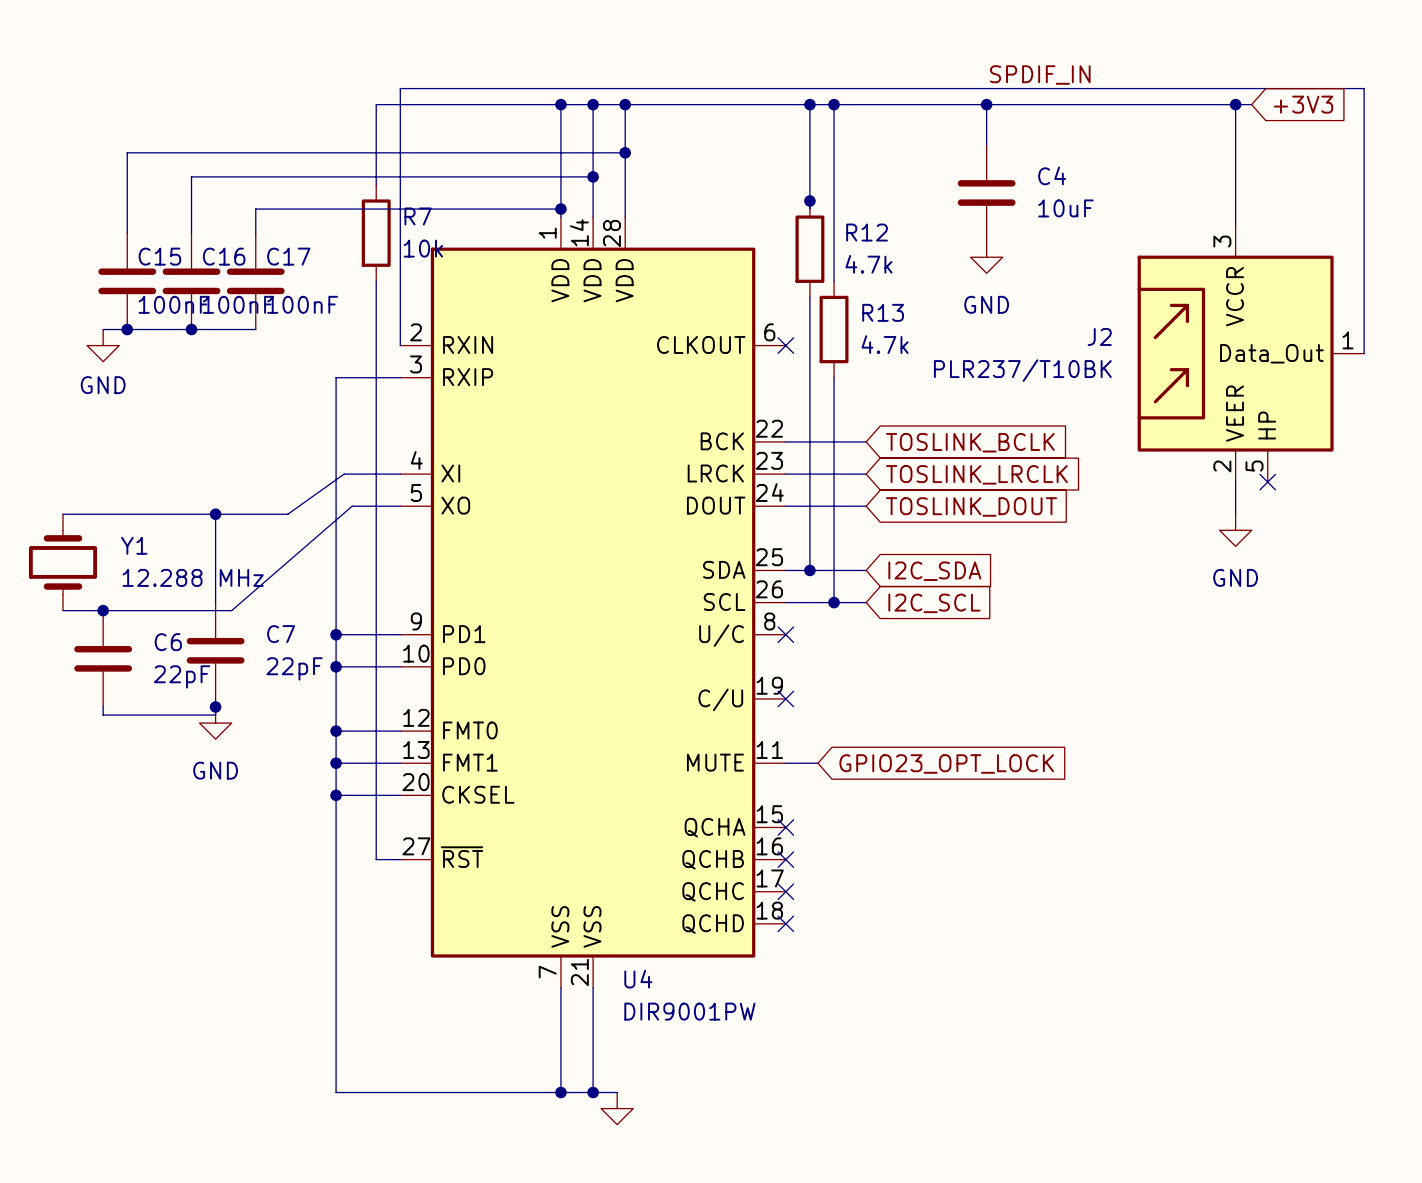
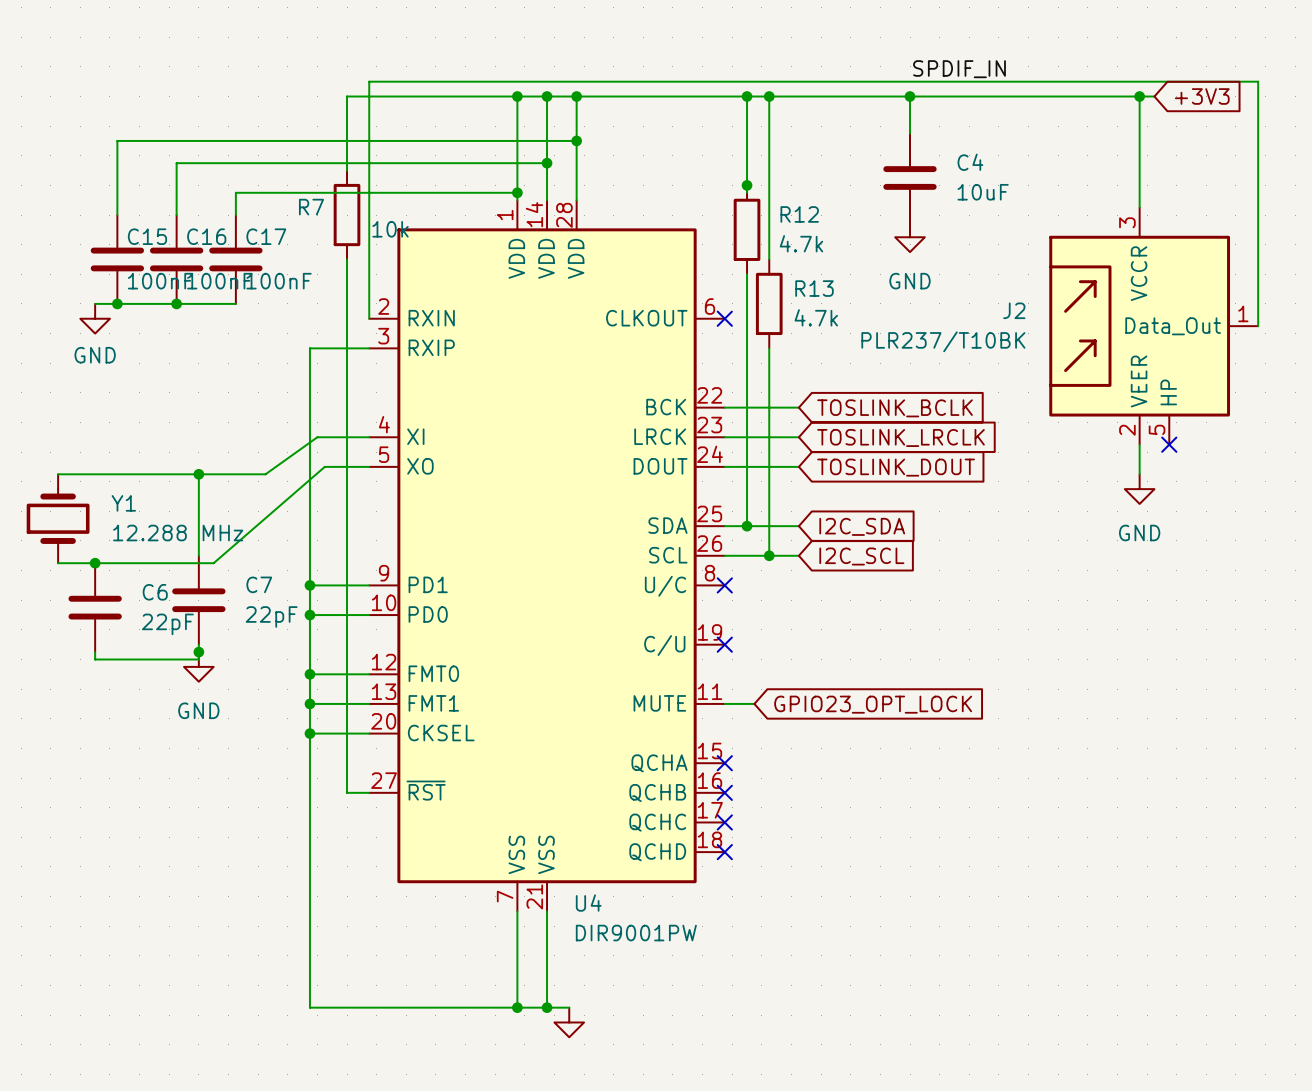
R7 name position: R7 (418, 216) -> R7 (311, 207)

